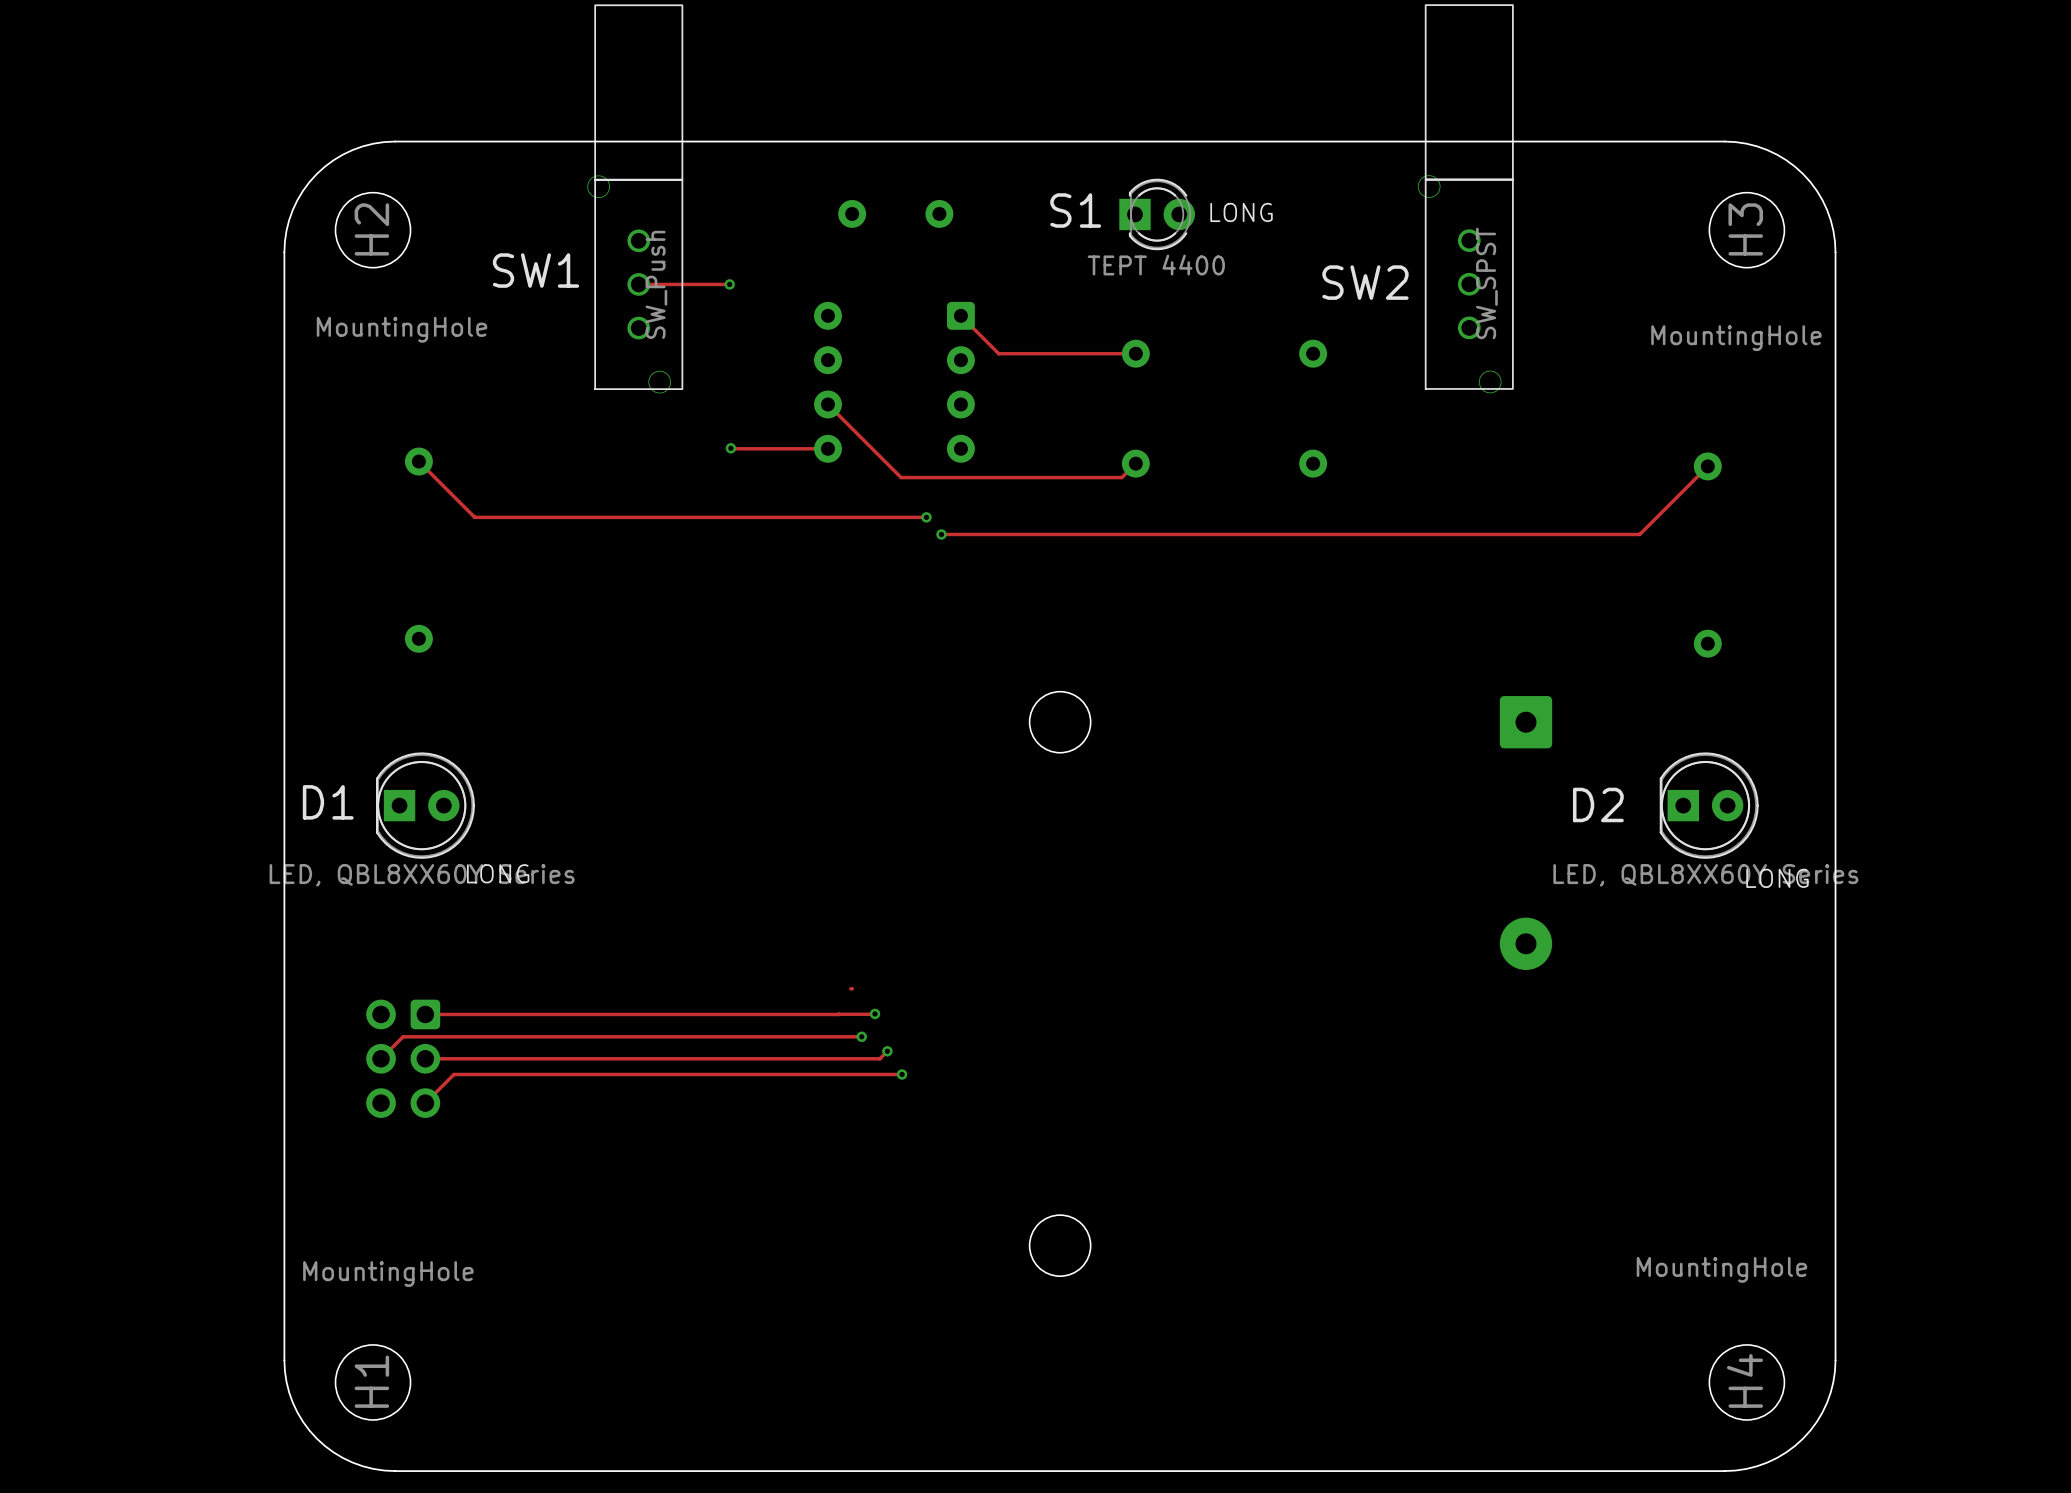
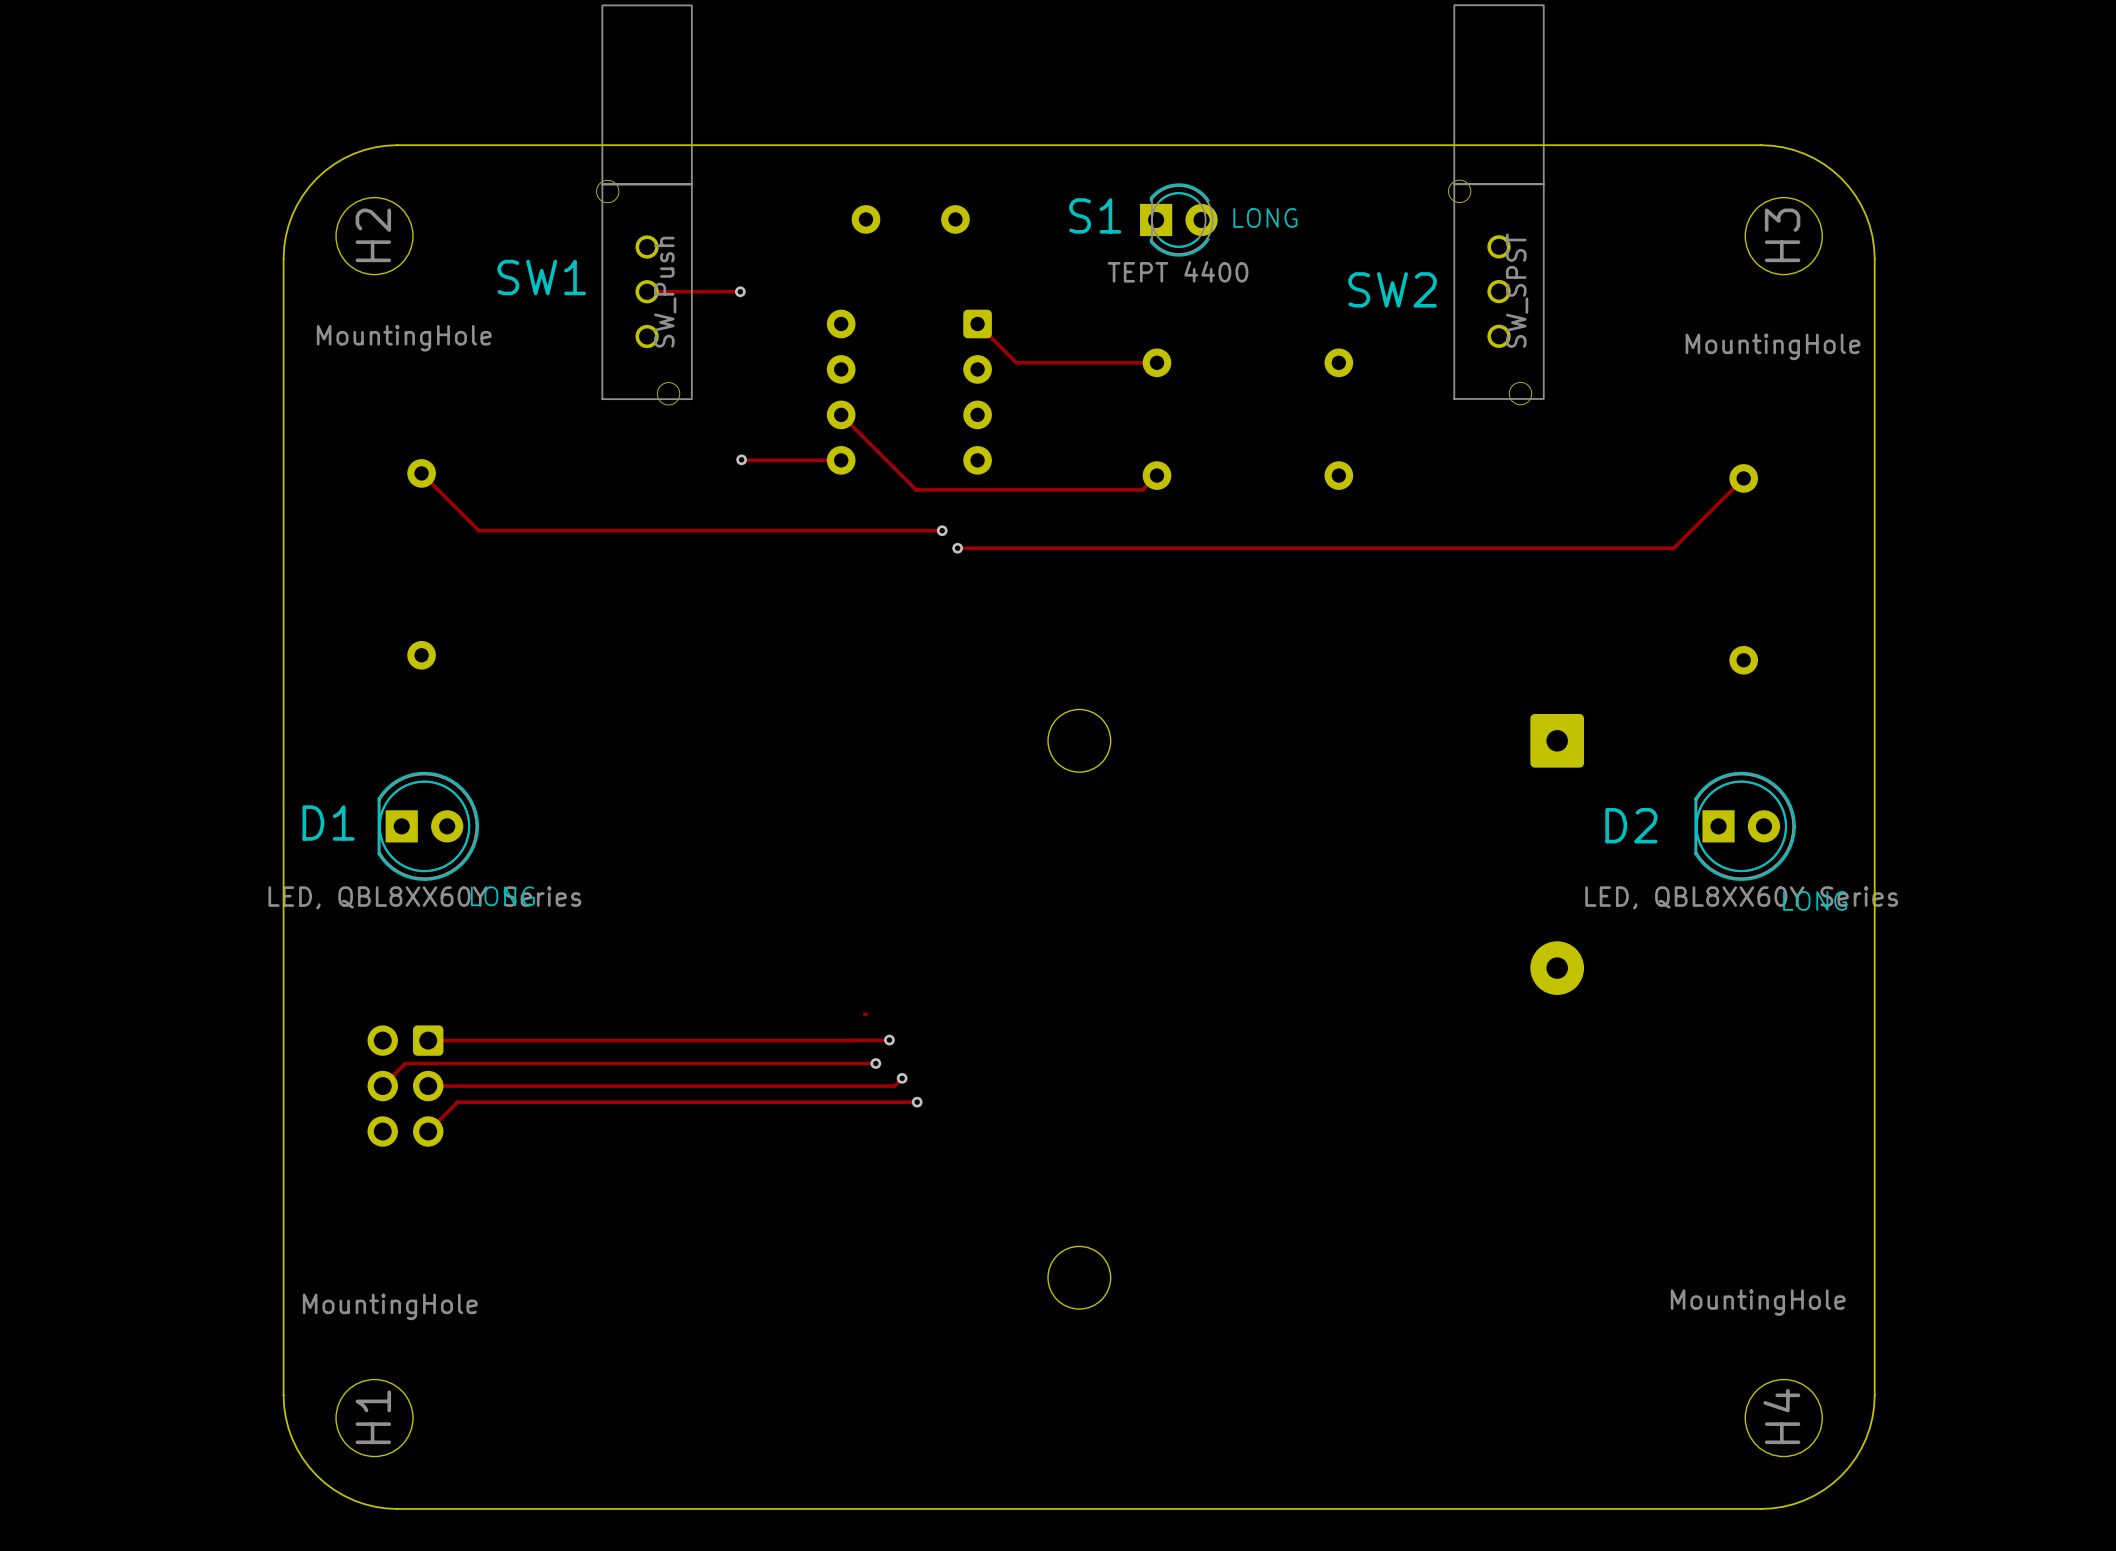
SW1 footprint: [587, 4, 684, 394] -> [596, 4, 693, 406]
SW2 footprint: [1417, 4, 1514, 394] -> [1448, 4, 1545, 406]

